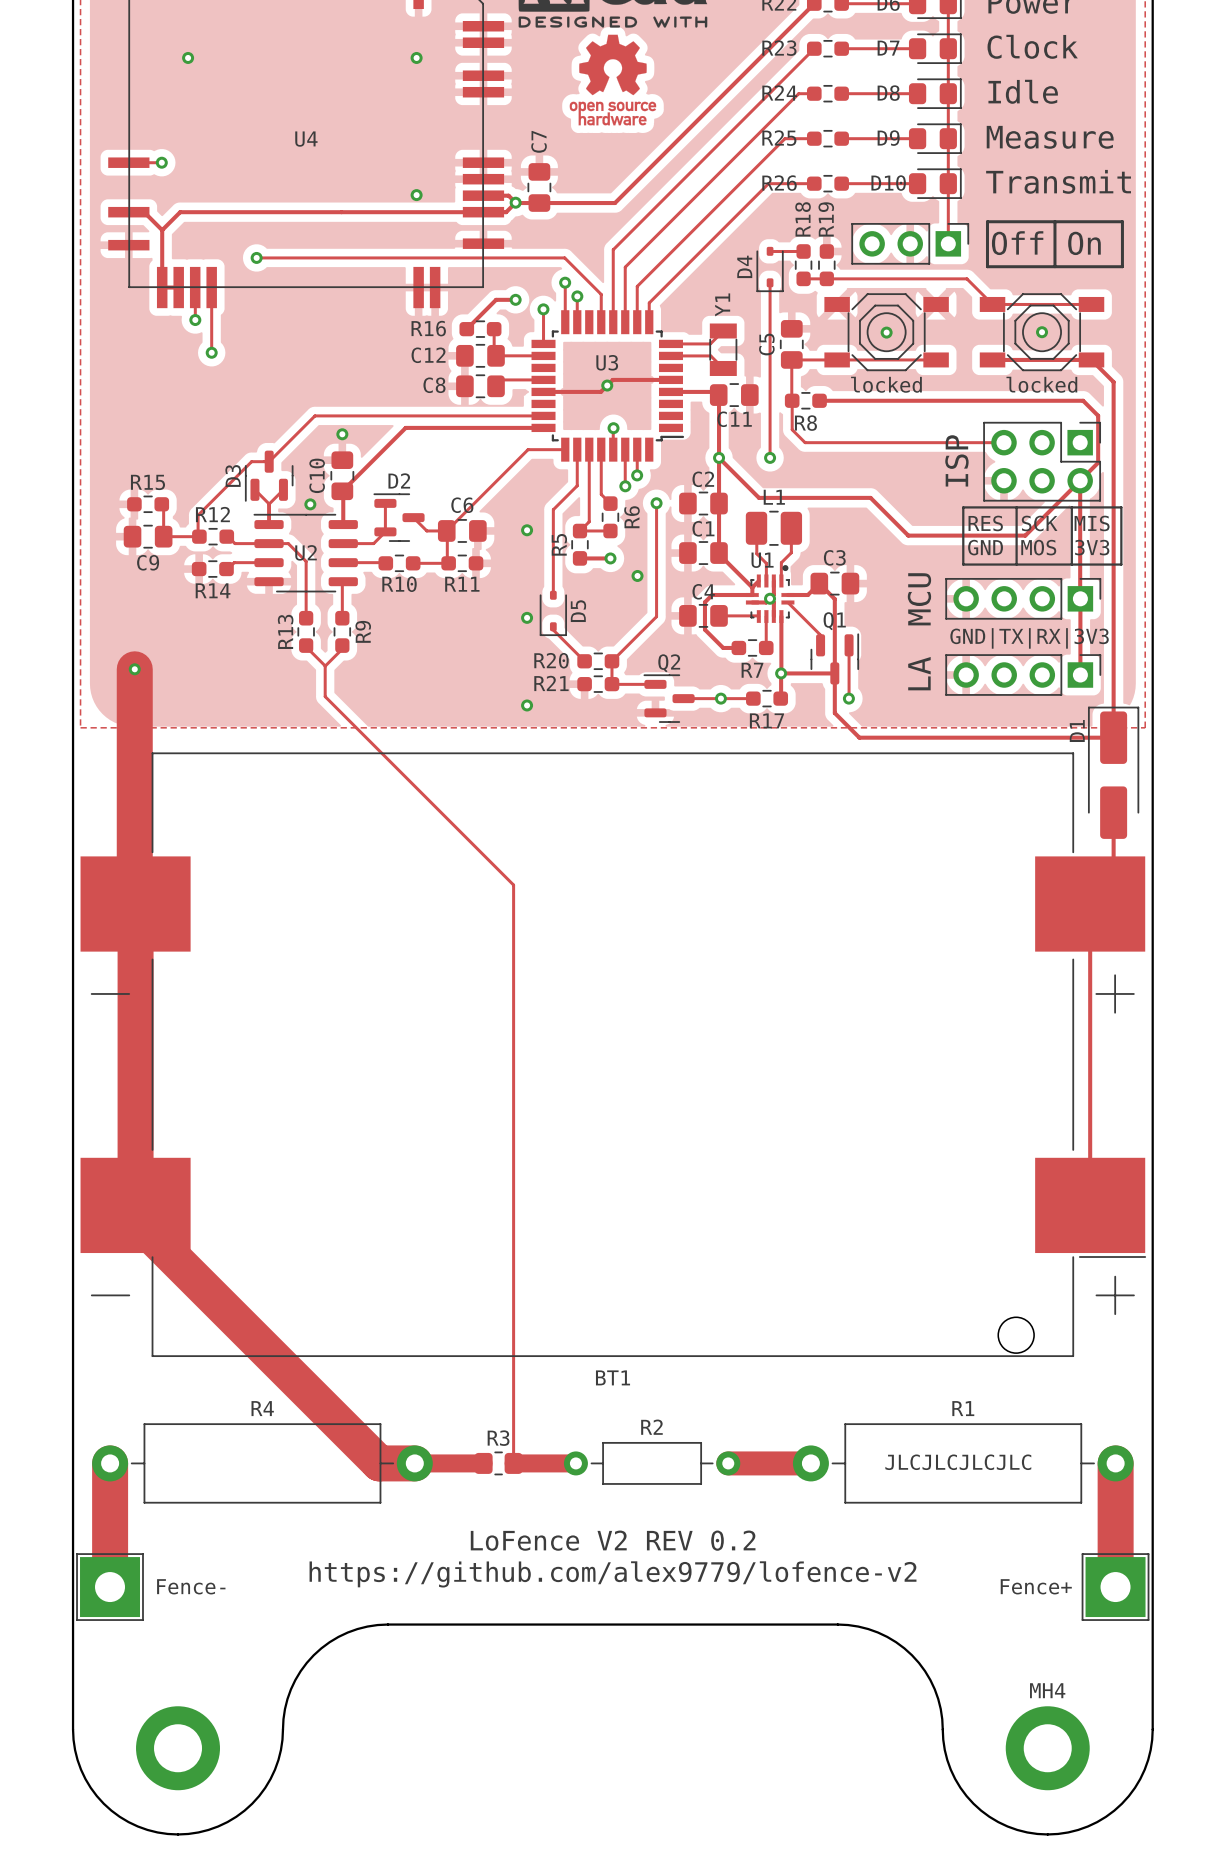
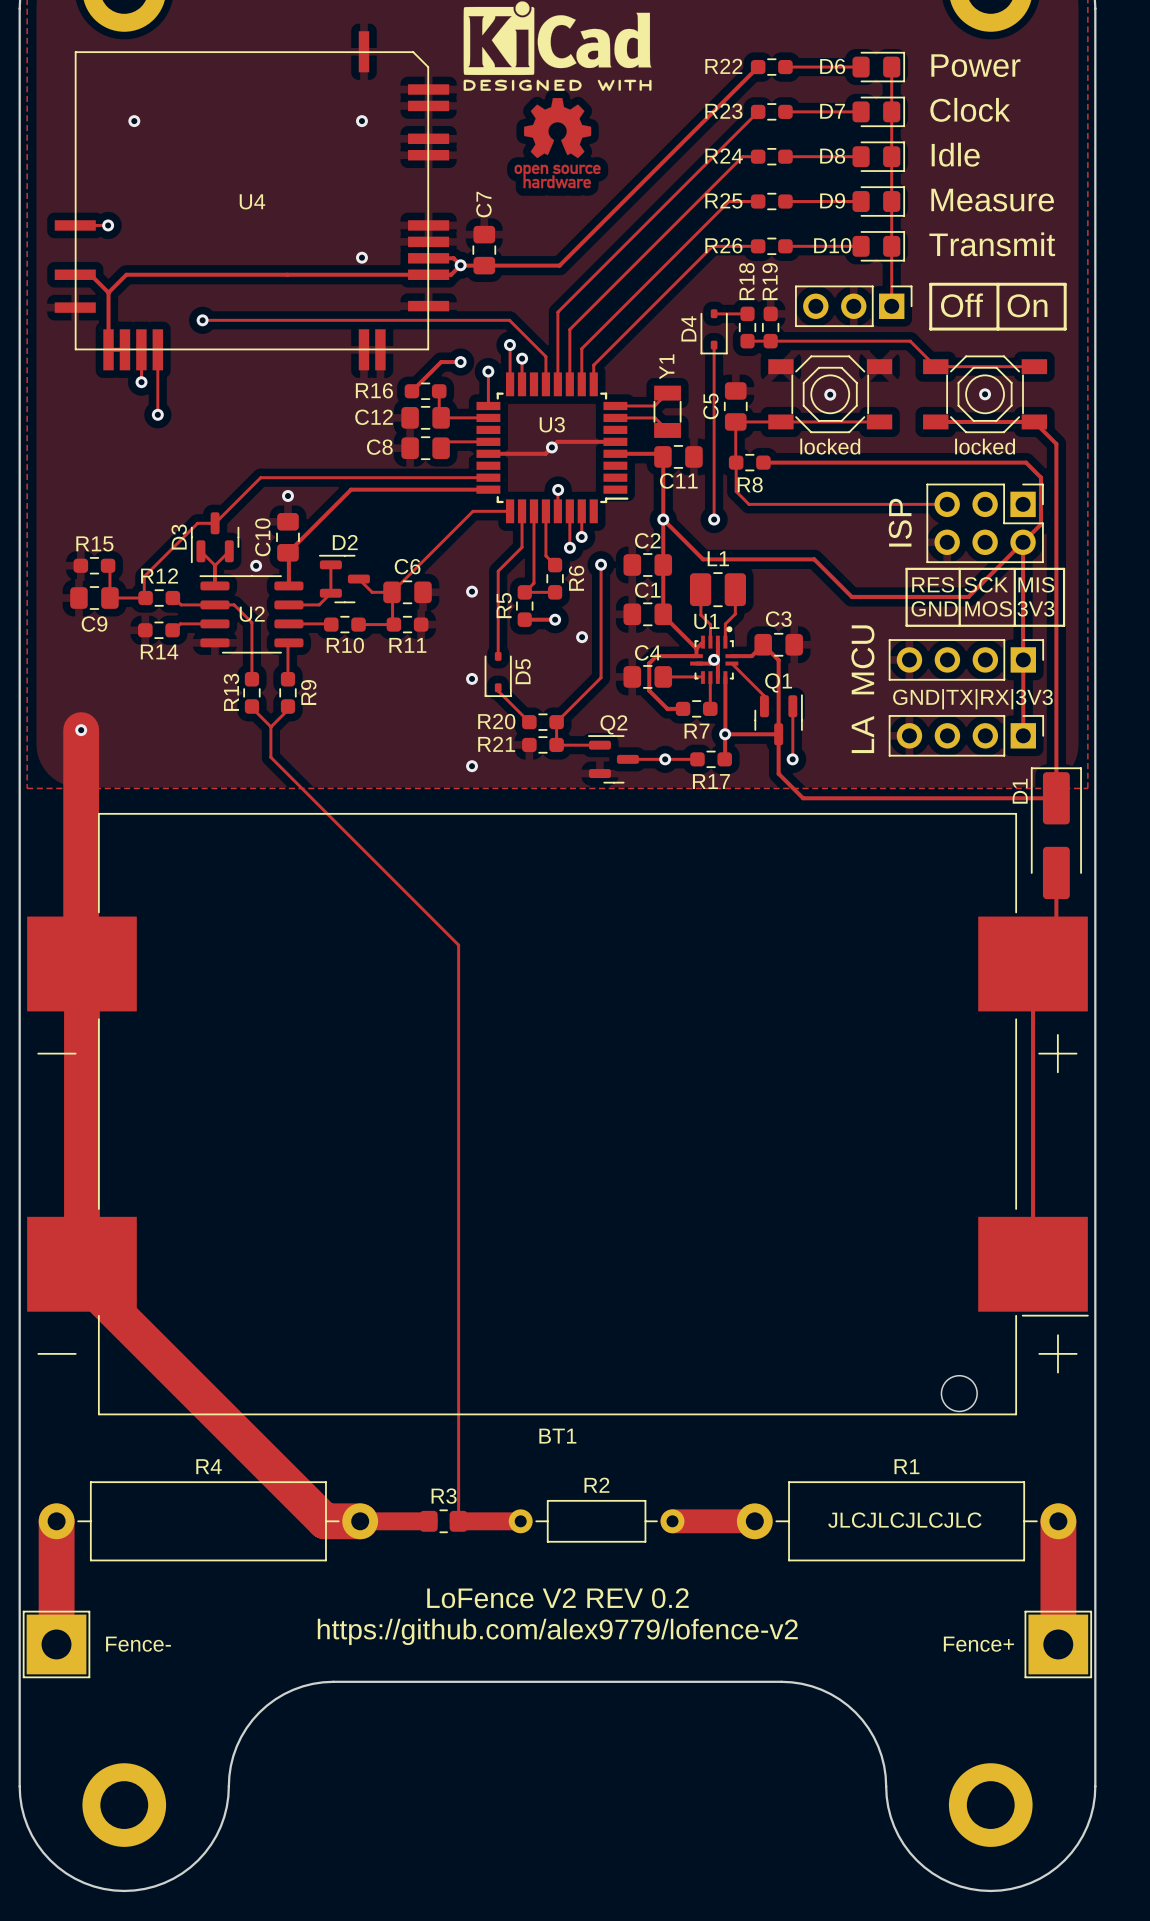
MH4 name: MH4 (1047, 1690) -> none

